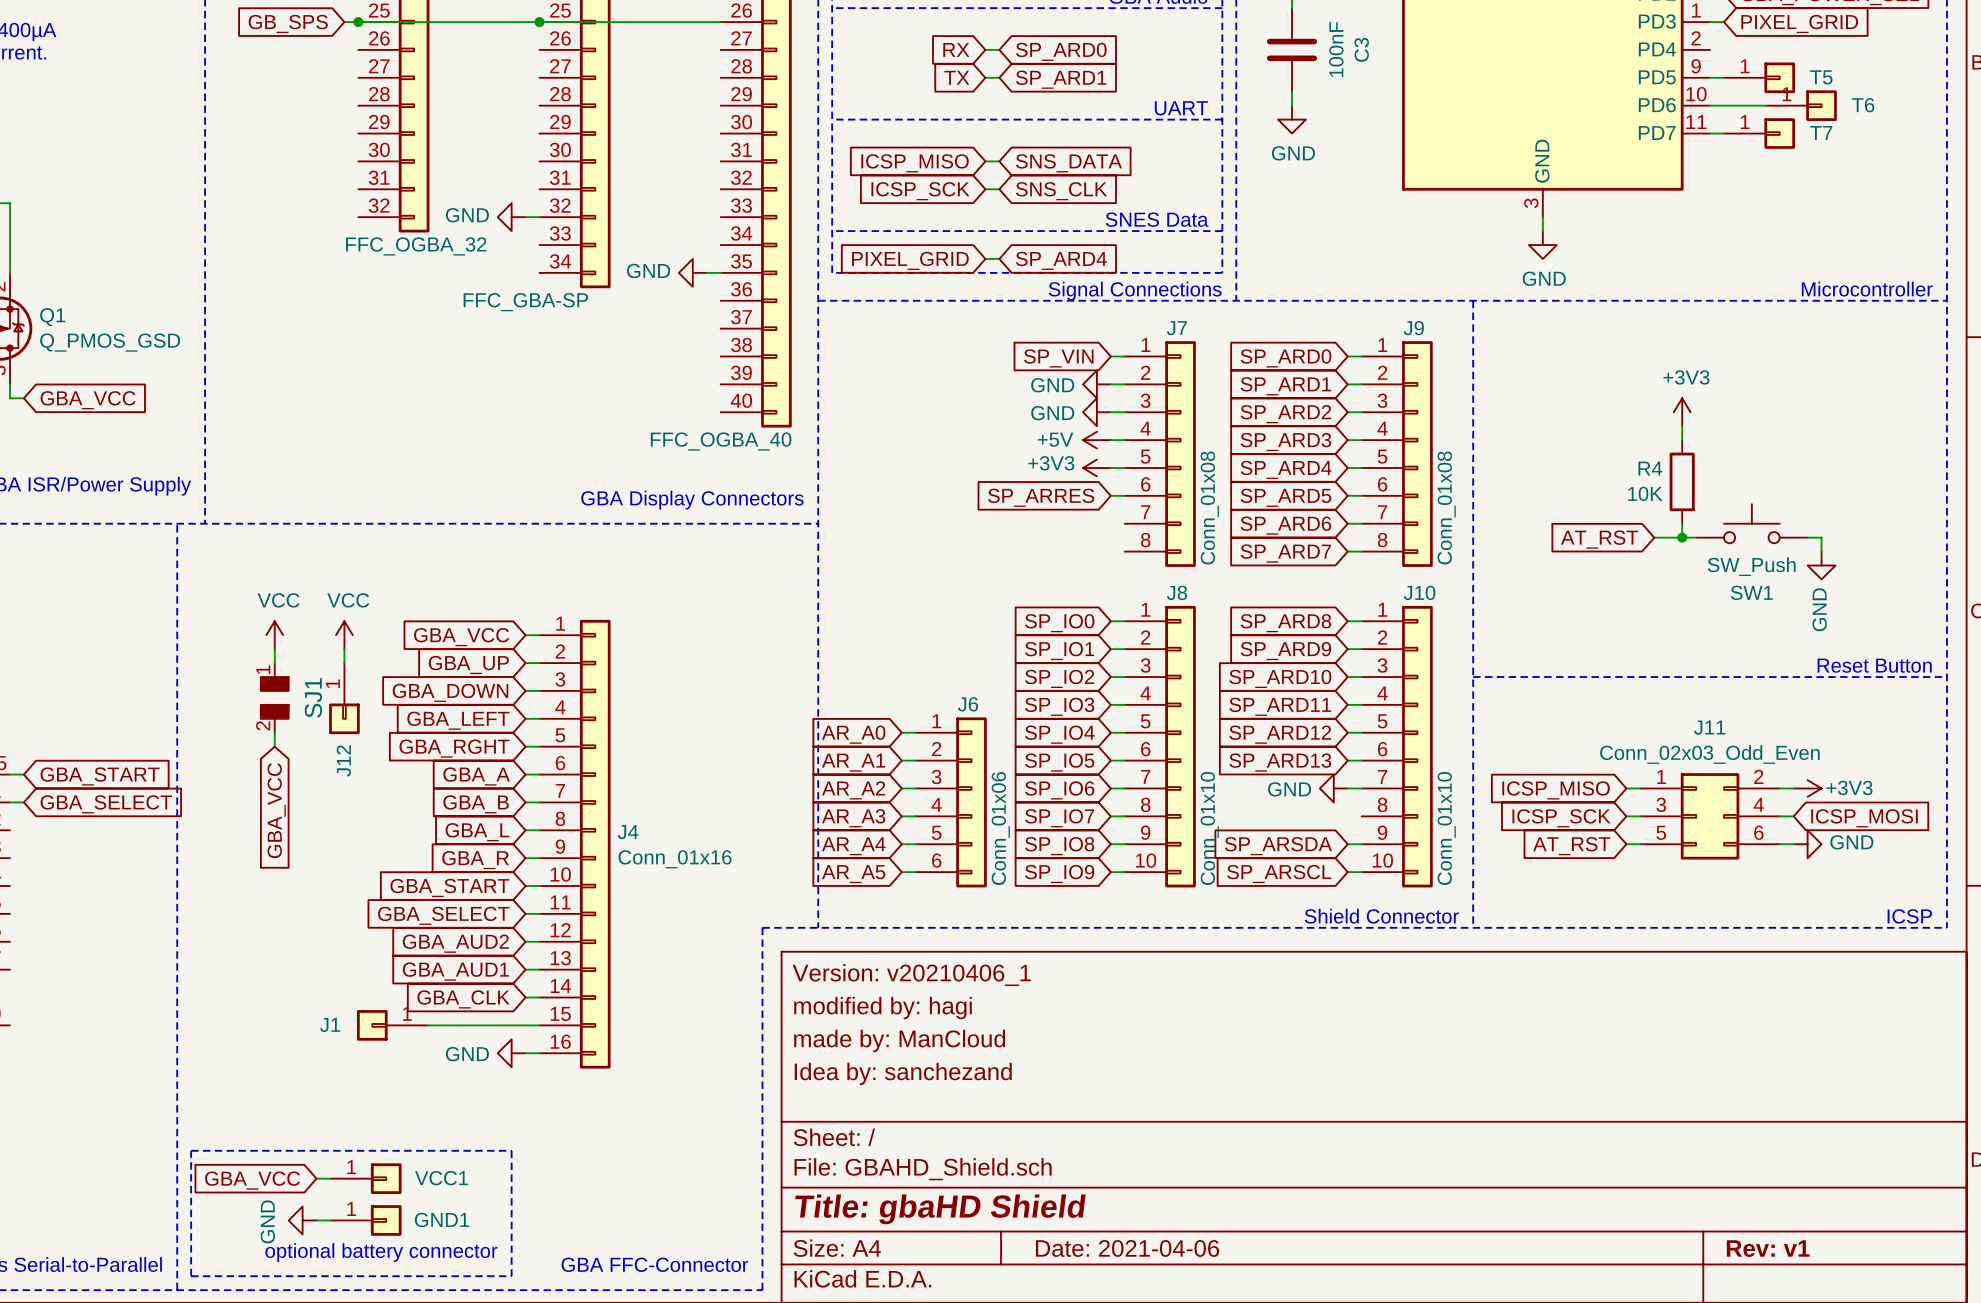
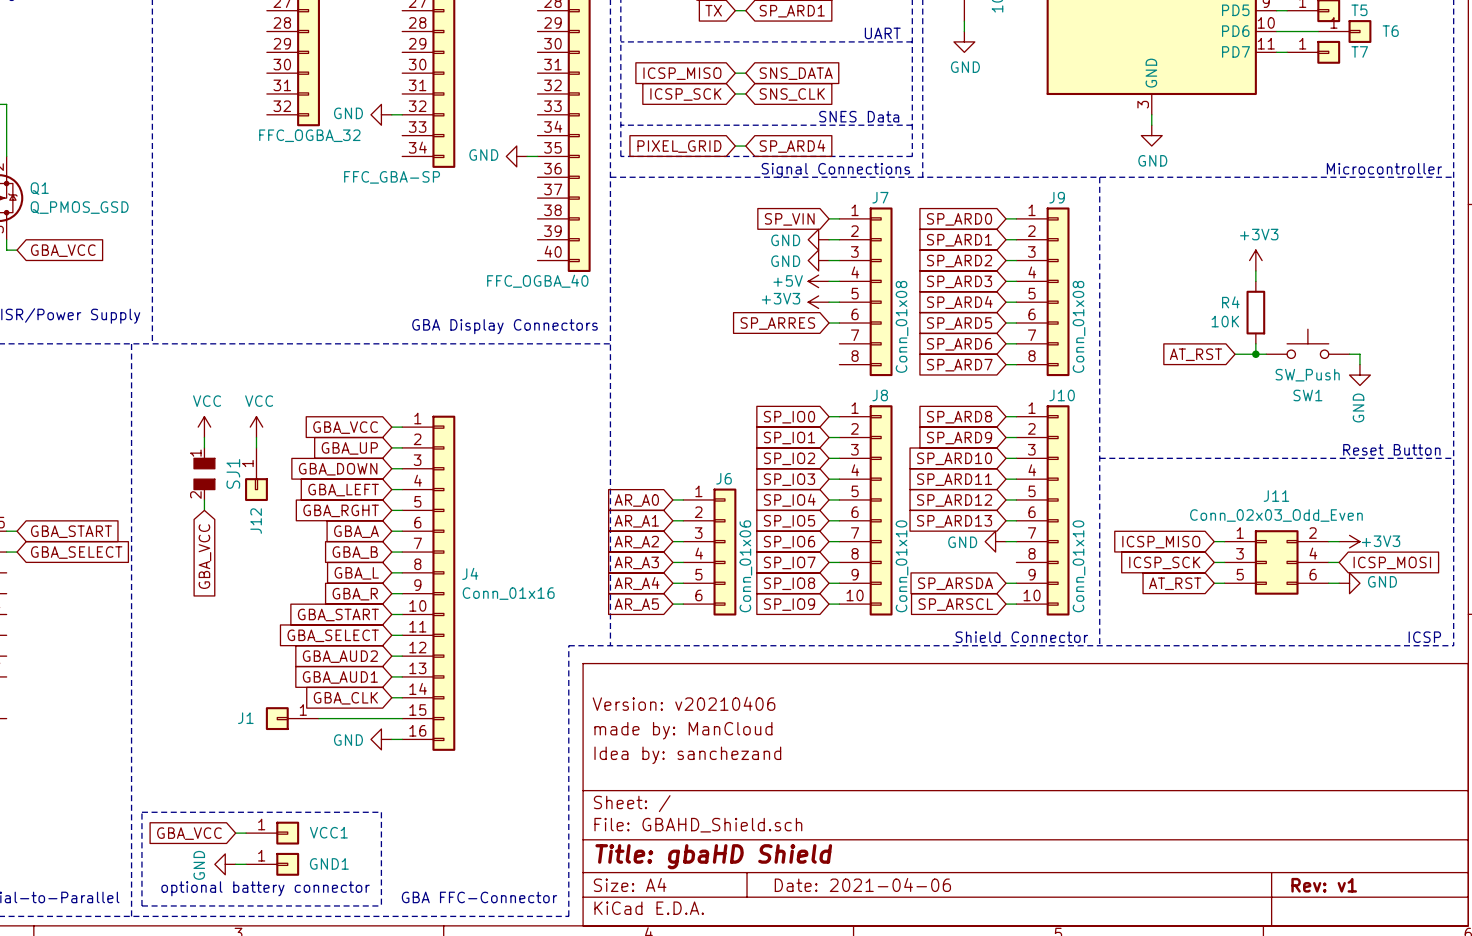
title block: Version: v20210406_1 (911, 975) -> none
title block: modified by: hagi (882, 1008) -> Version: v20210406 (684, 703)

